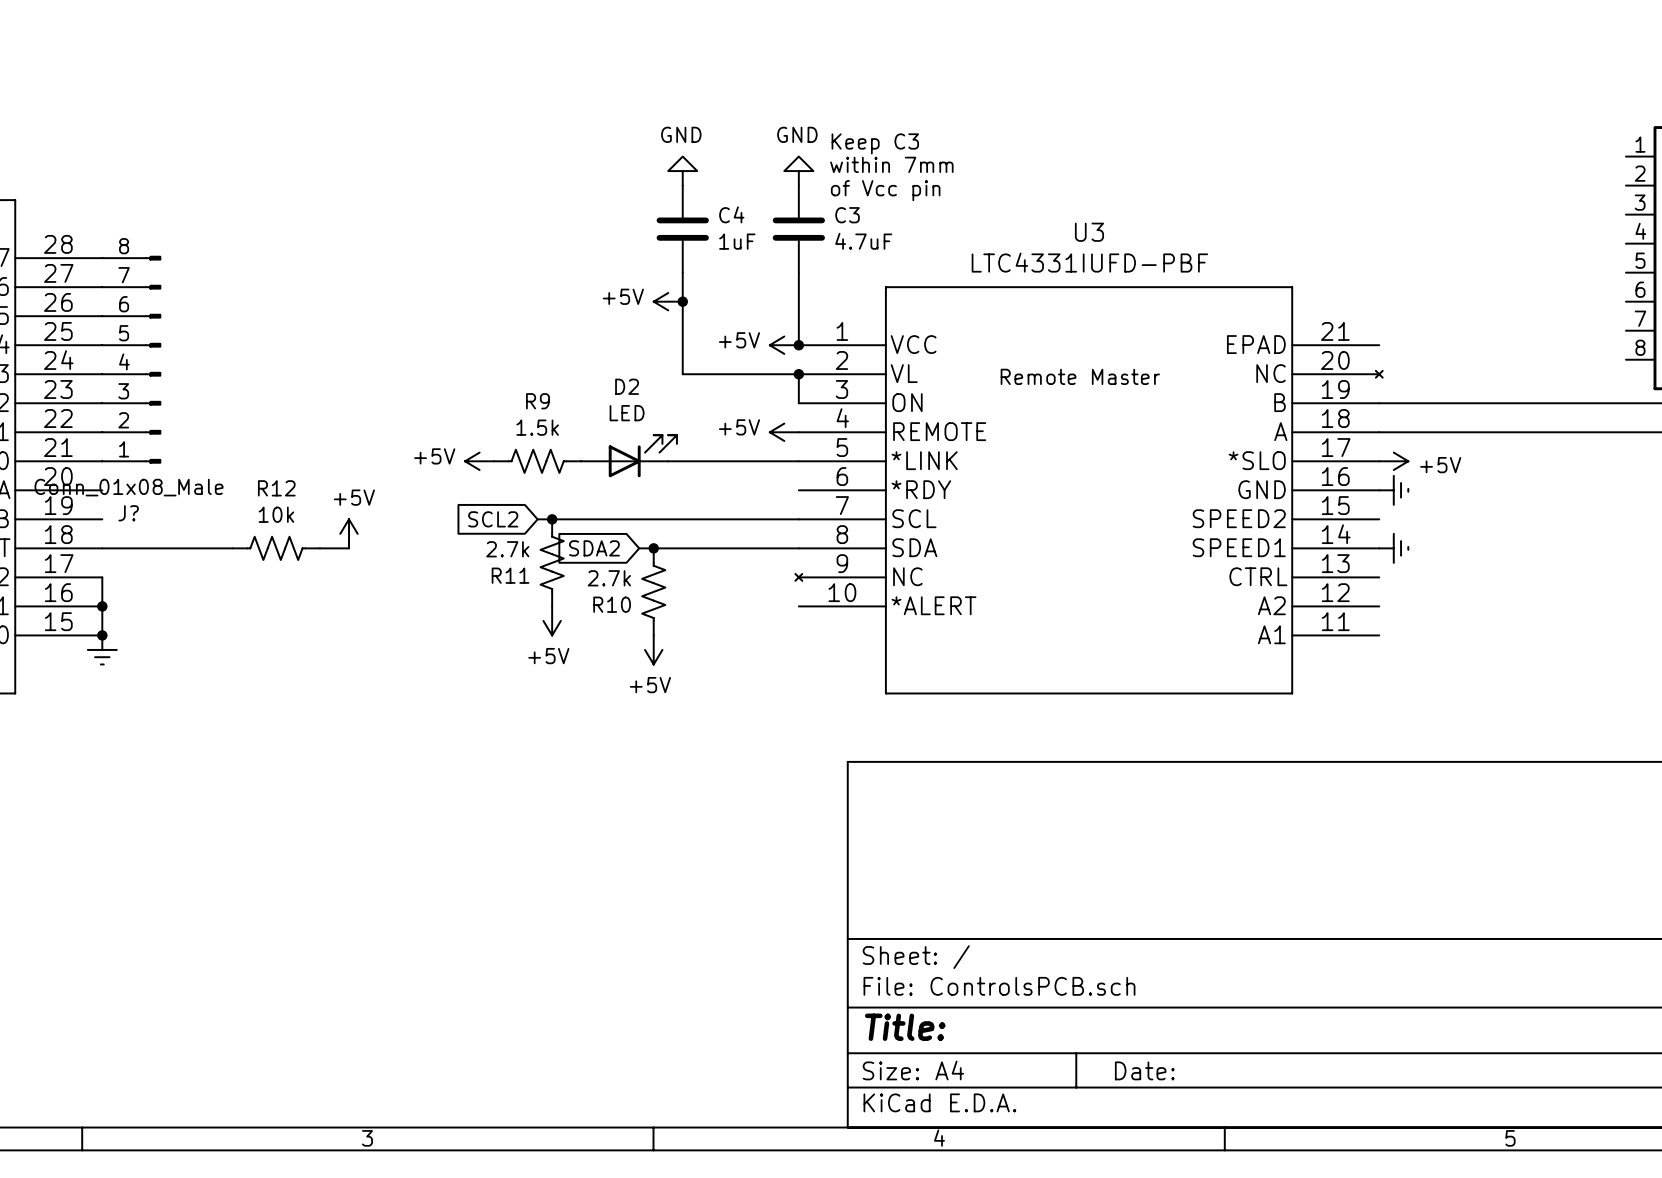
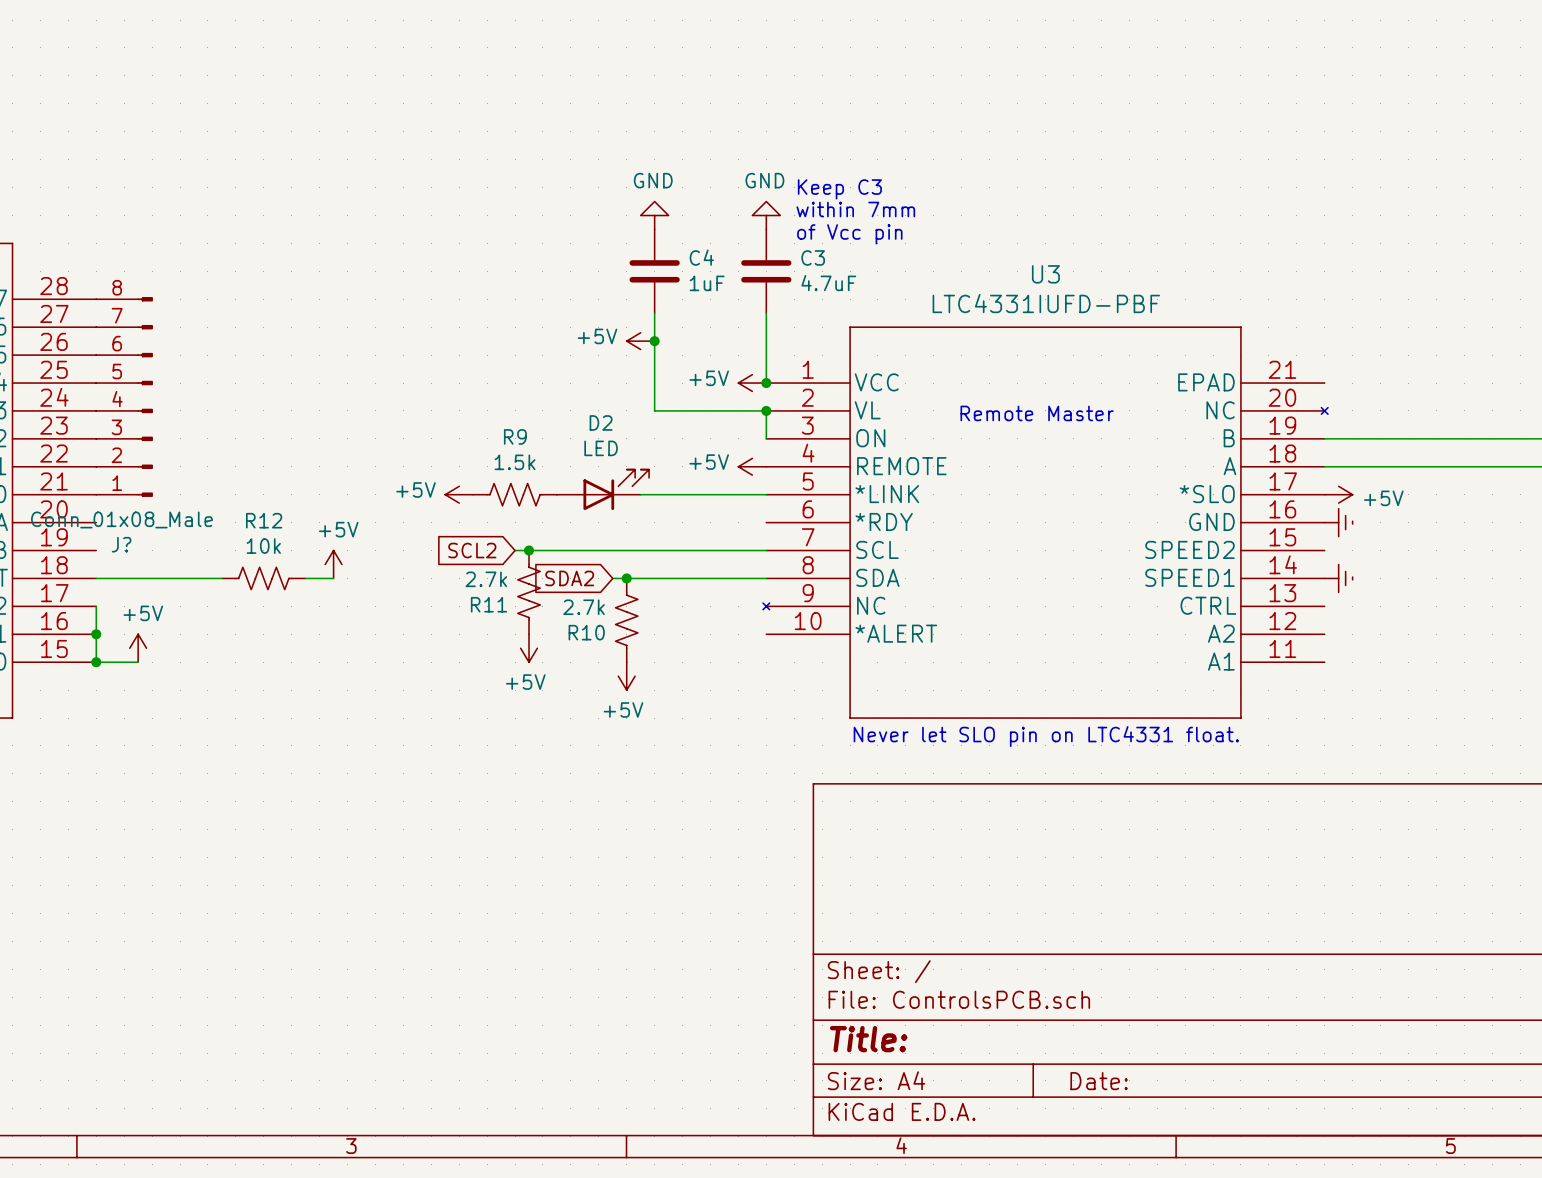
power symbol: none -> +5V (138, 648)
wire: none -> (96, 662) (138, 662)
power symbol: (102, 649) -> none
text: none -> Never let SLO pin on LTC4331 float. (1046, 736)

